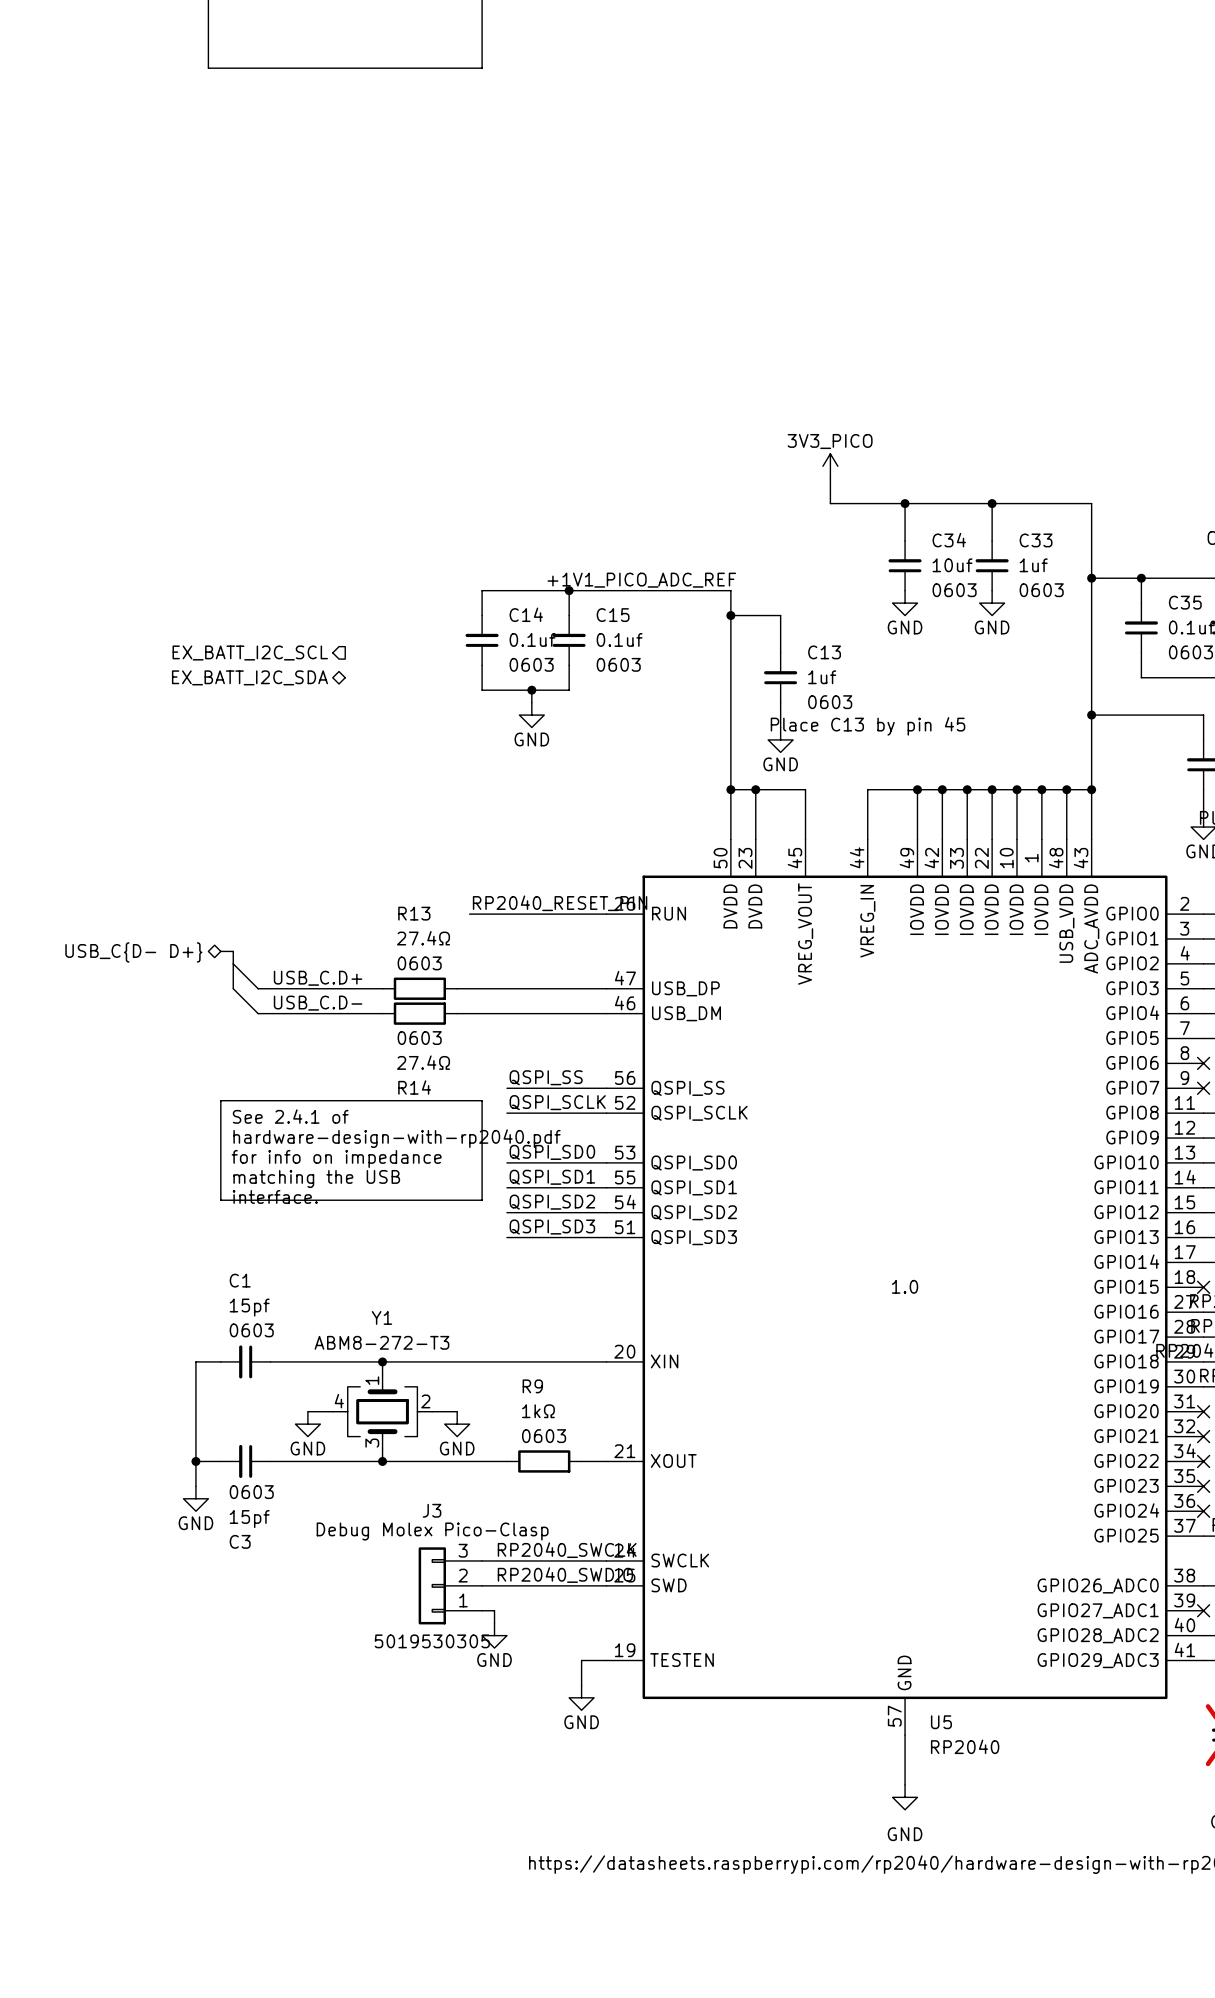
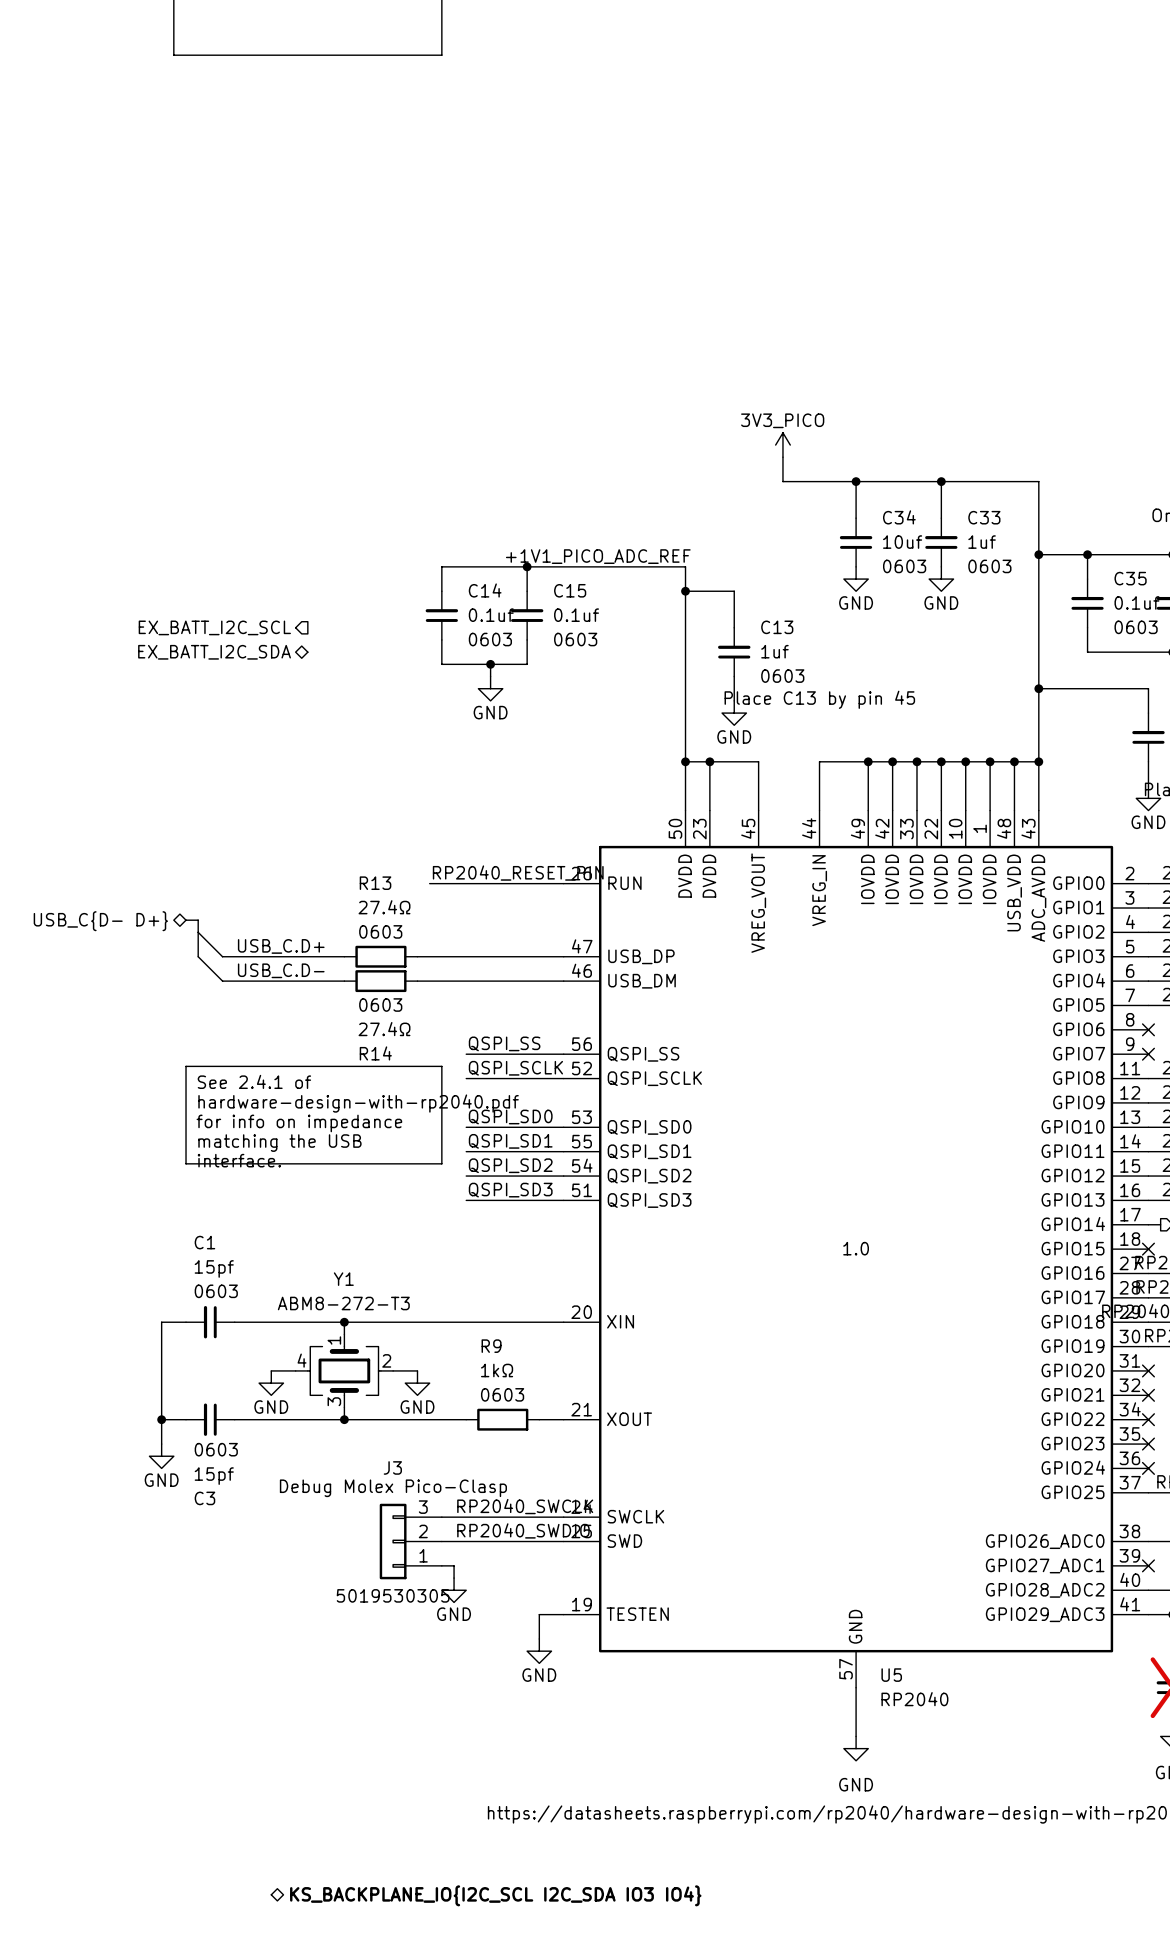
hierarchical label: none -> KS_BACKPLANE_IO{I2C_SCL I2C_SDA IO3 IO4} (495, 1895)

